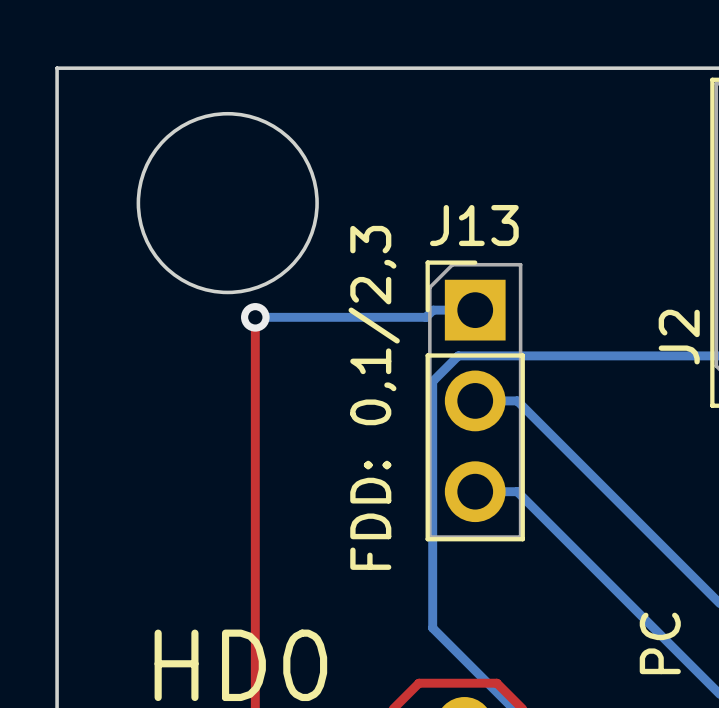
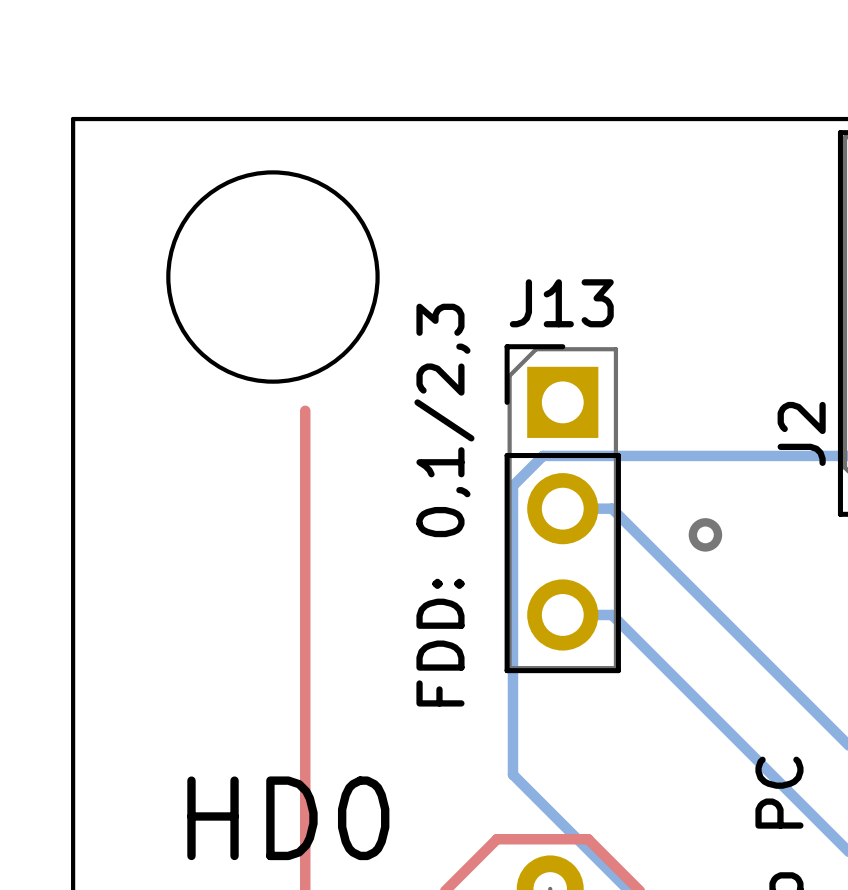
bottom track: (475, 310) (433, 310) (425, 317) (255, 317) -> none
via: (255, 317) -> none
via: none -> (705, 534)

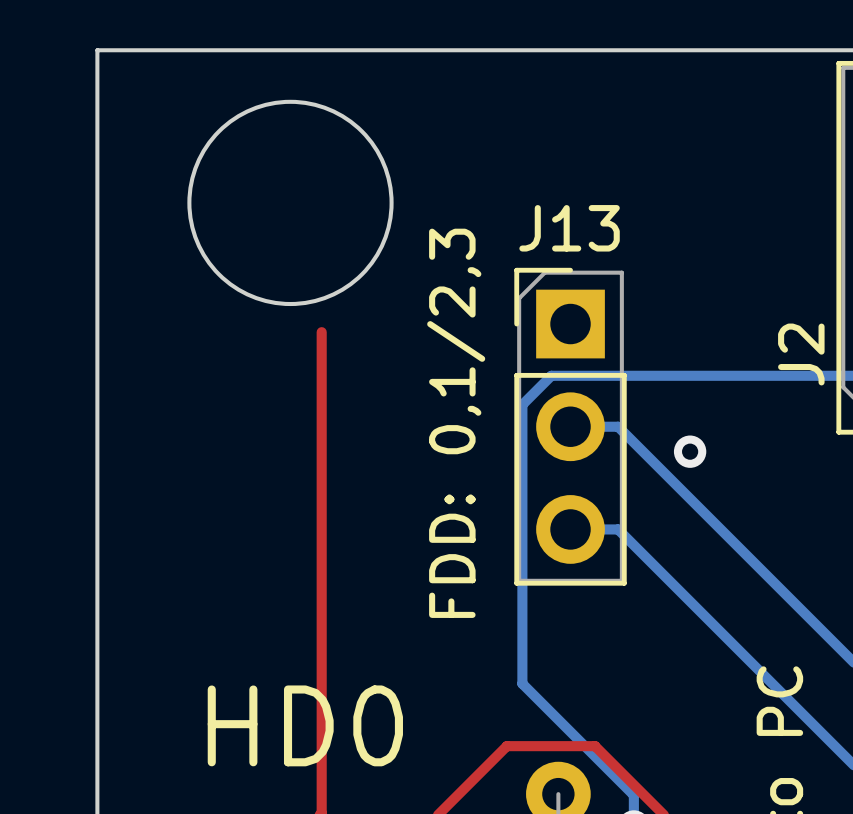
via position: (705, 534) -> (690, 451)

